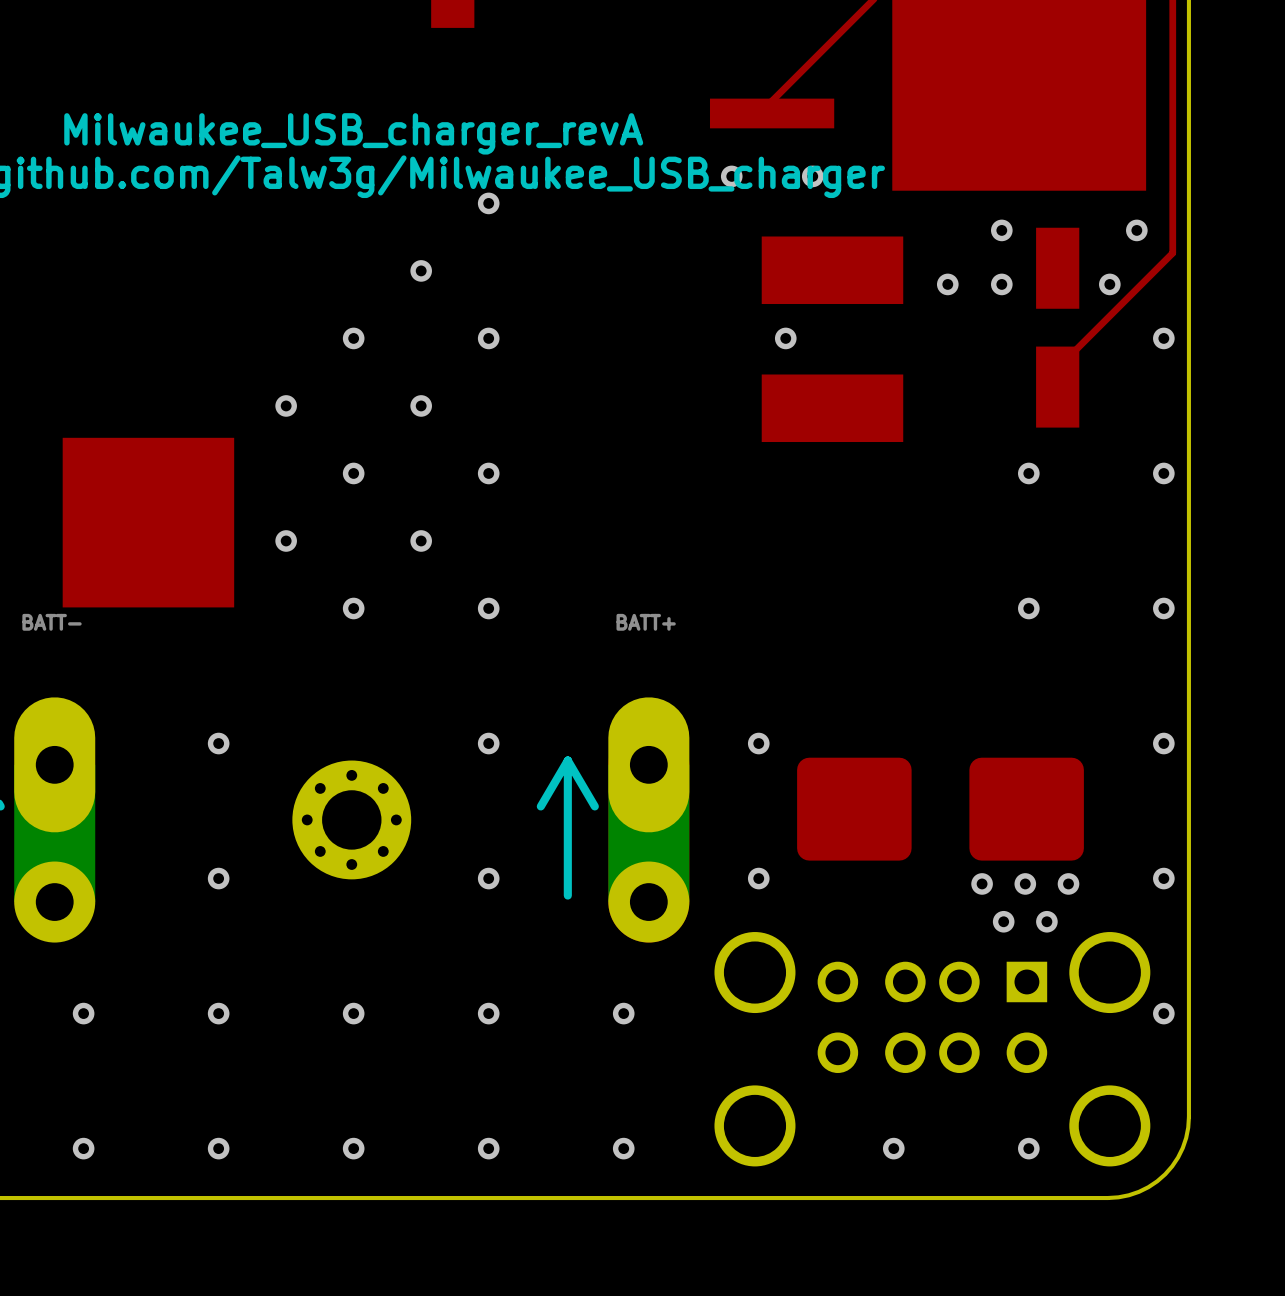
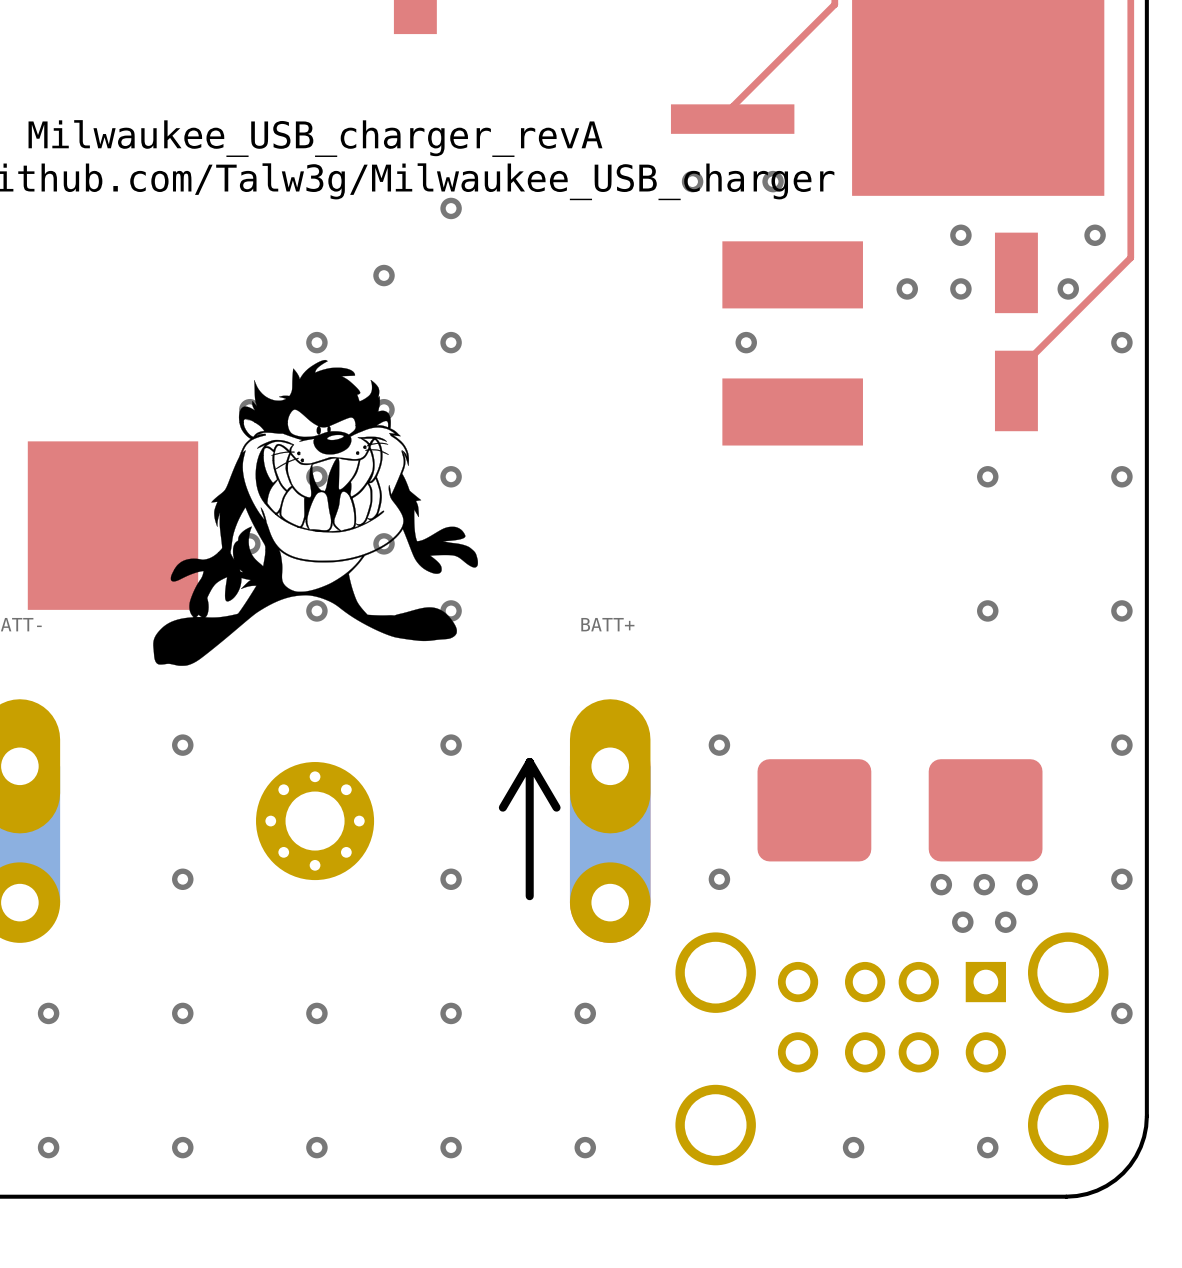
drawing: none -> [153, 359, 478, 666]

